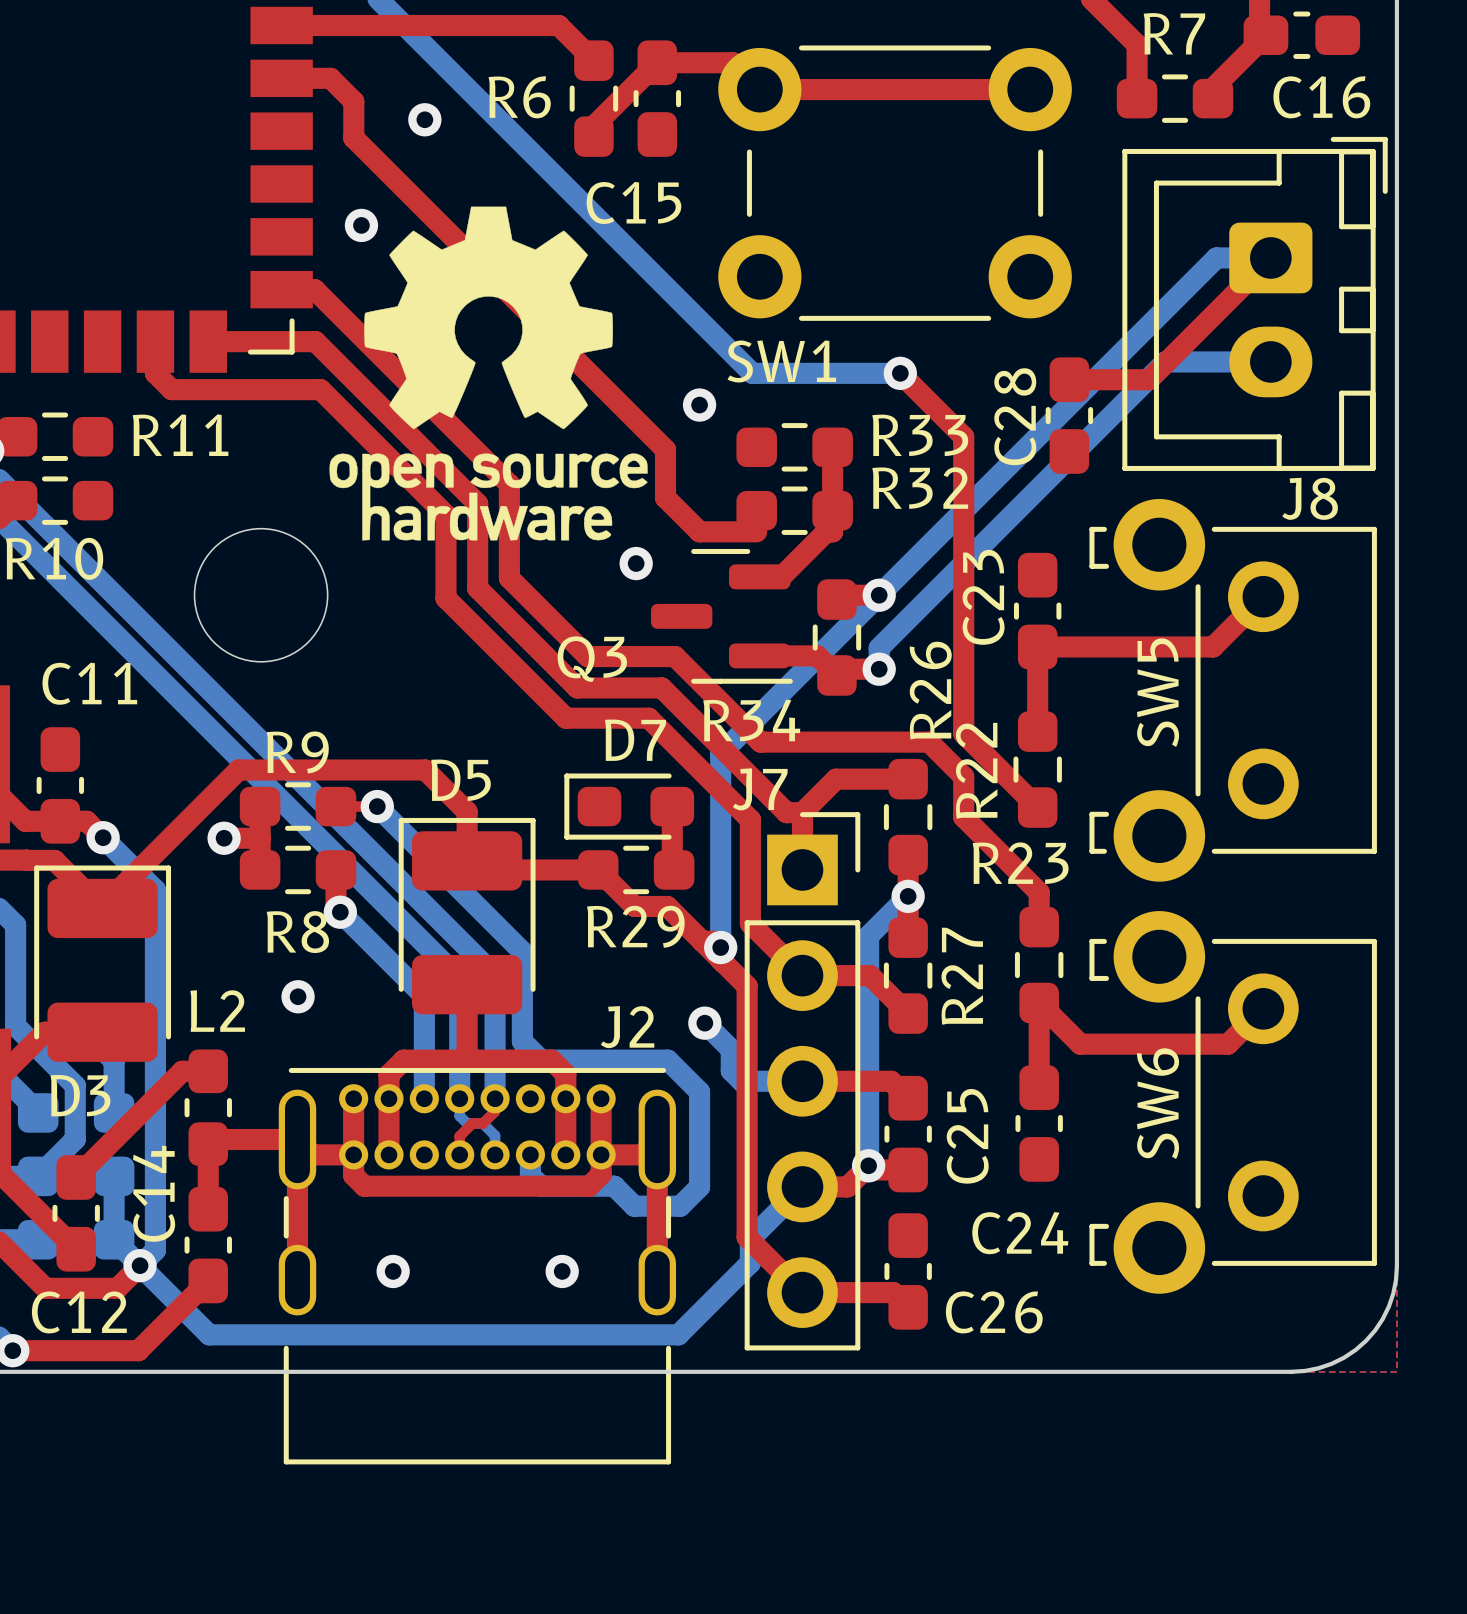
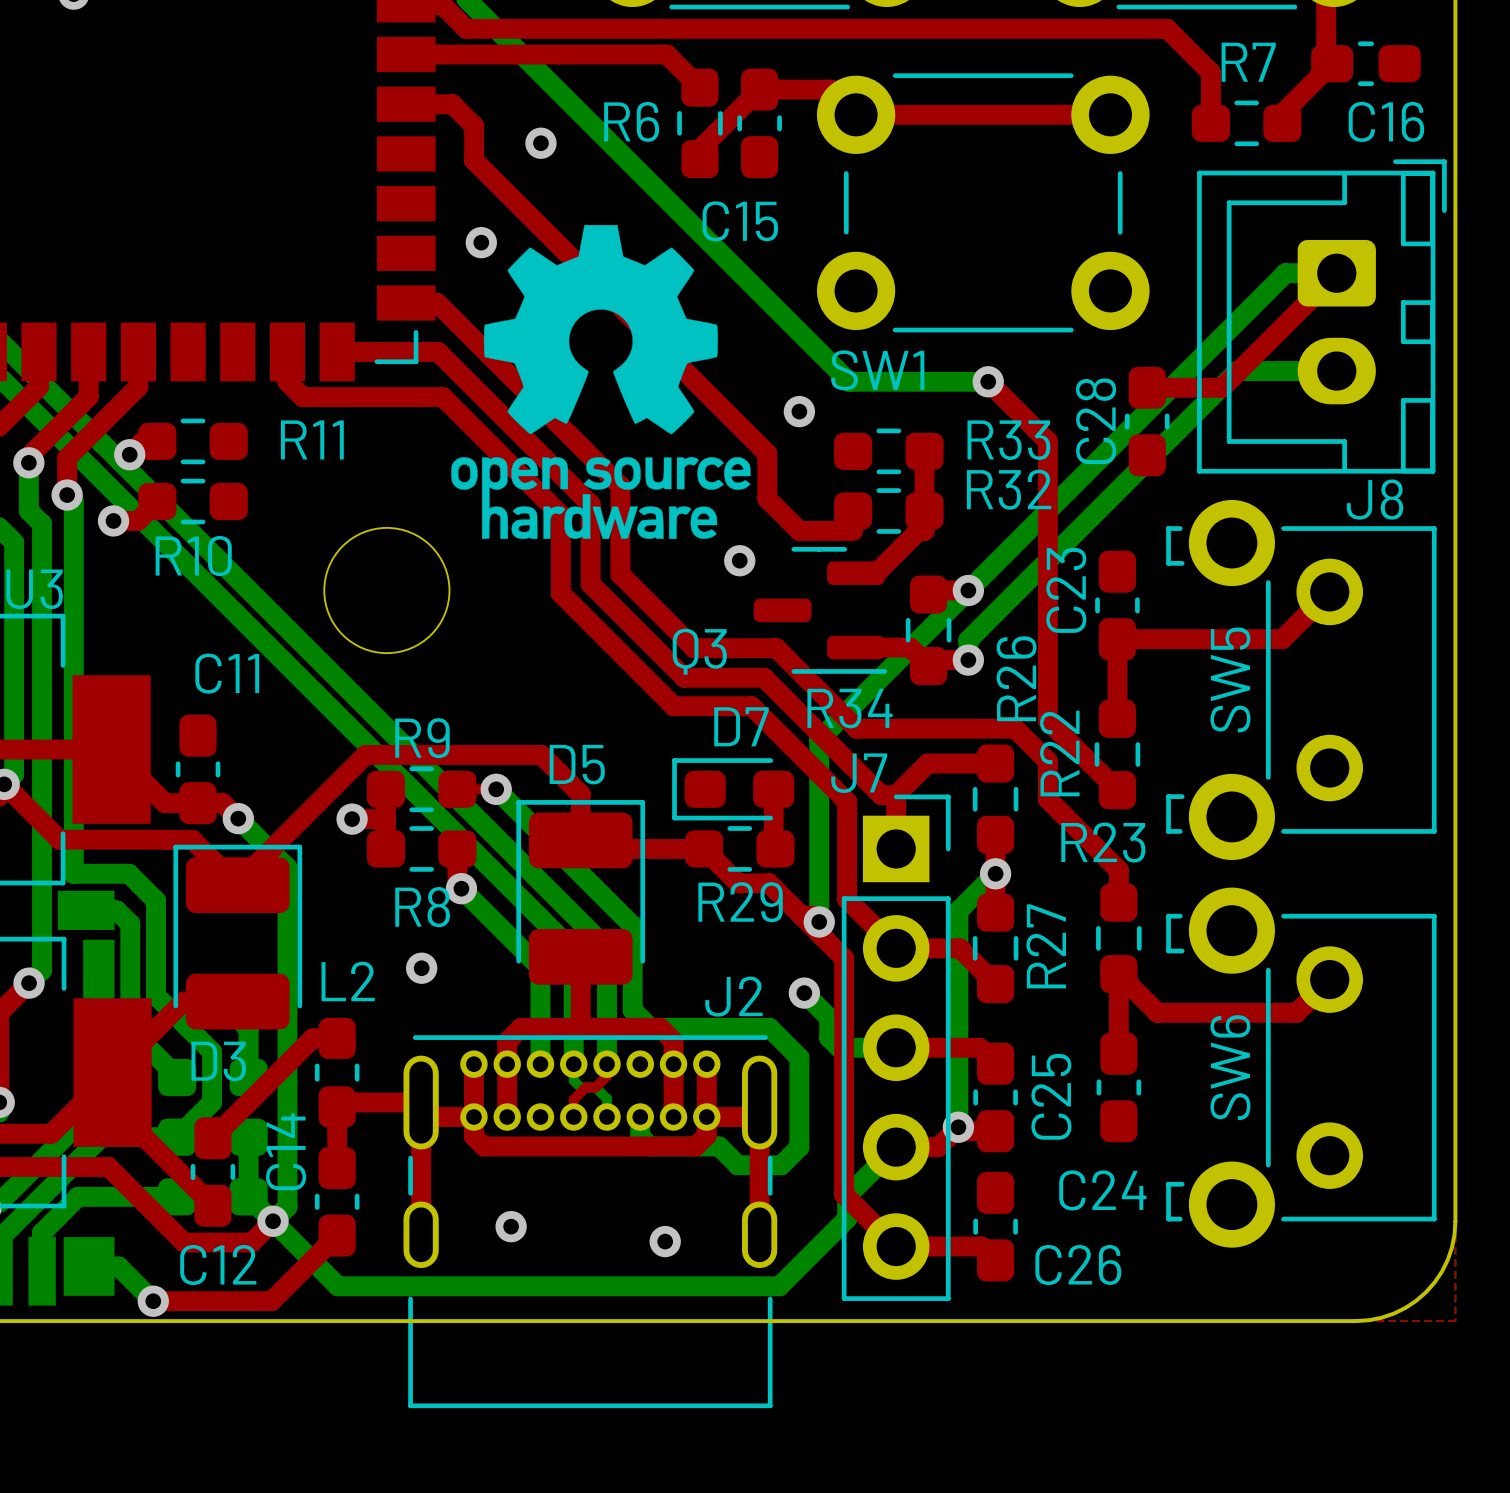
via position: (562, 1271) -> (665, 1241)

